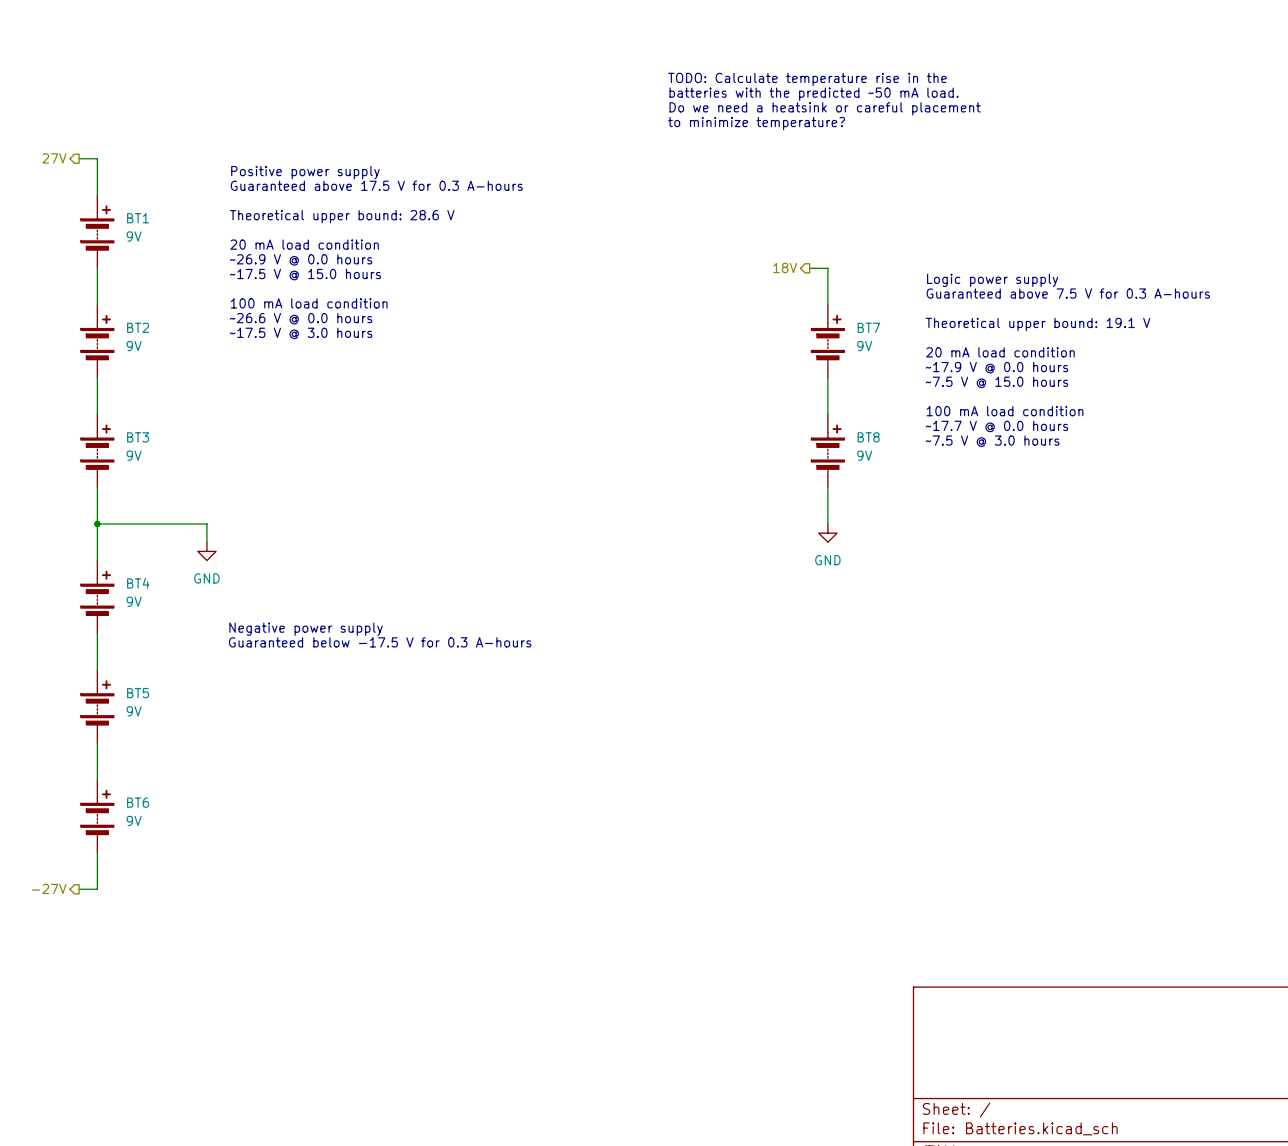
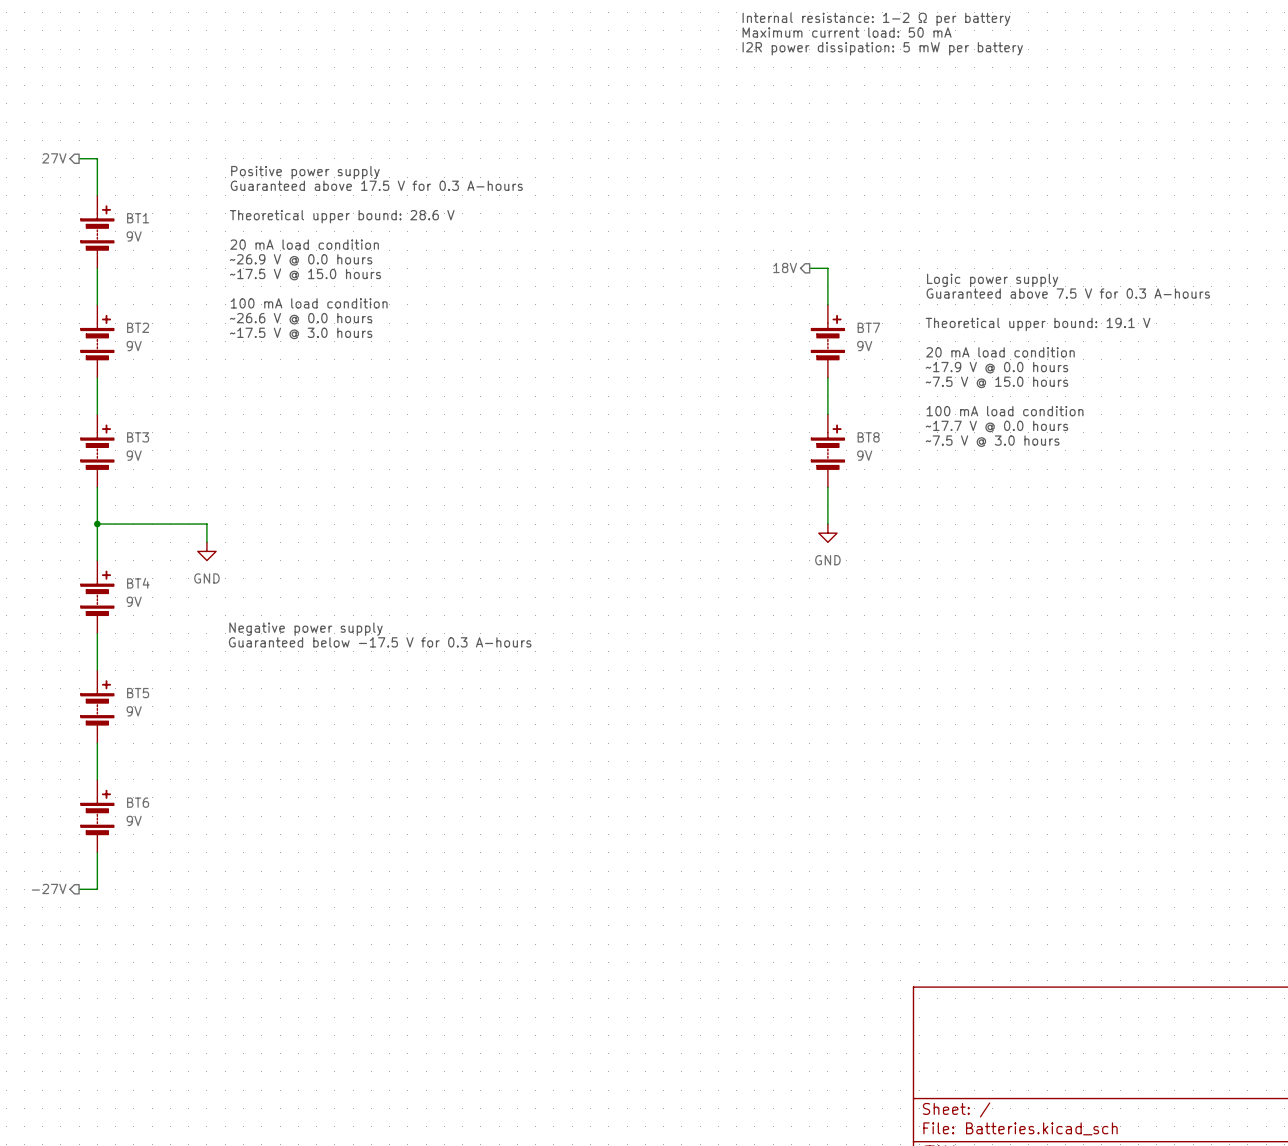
text: none -> Internal resistance: 1-2 Ω per battery (876, 19)
text: none -> Maximum current load: 50 mA (847, 32)
text: none -> I2R power dissipation: 5 mW per battery (882, 48)
text: TODO: Calculate temperature rise in the (807, 79) -> none
text: batteries with the predicted ~50 mA load. (814, 94) -> none
text: Do we need a heatsink or careful placement (825, 108) -> none
text: to minimize temperature? (756, 123) -> none

